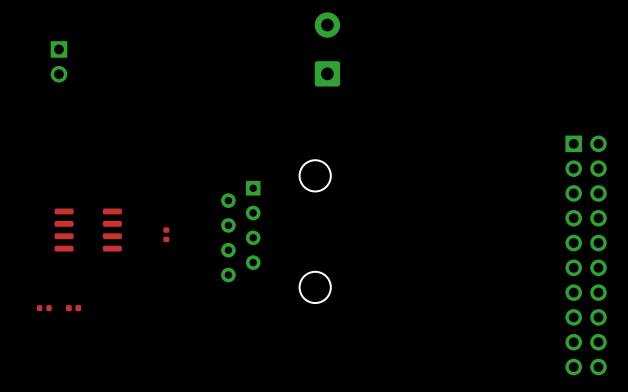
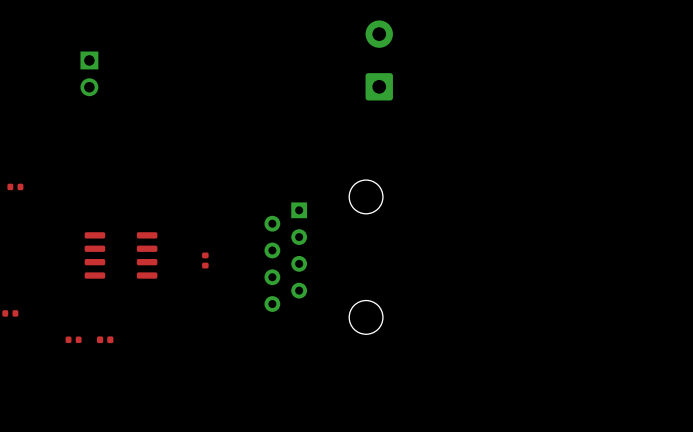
part: (586, 255) -> none

